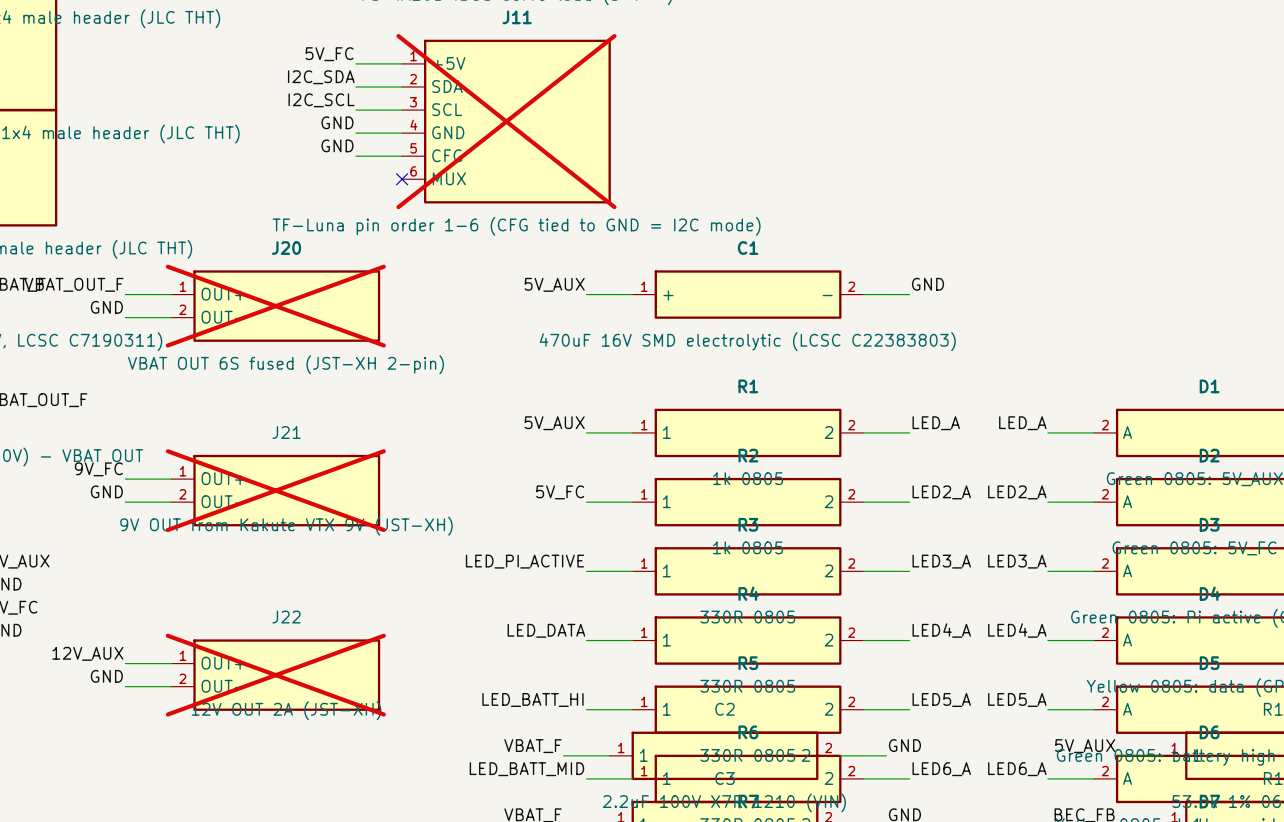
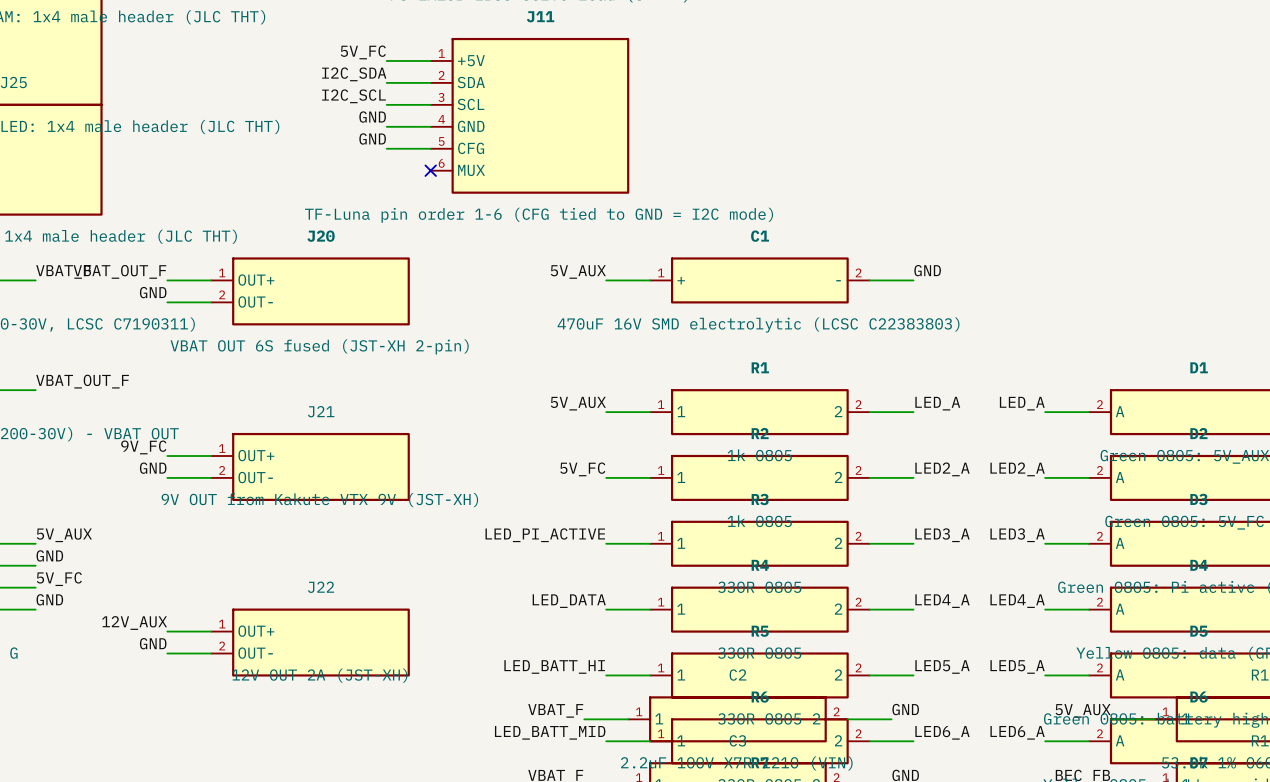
J11 do-not-place cross: (506, 121) -> none
J20 do-not-place cross: (275, 306) -> none
J21 do-not-place cross: (275, 490) -> none
J22 do-not-place cross: (275, 675) -> none

